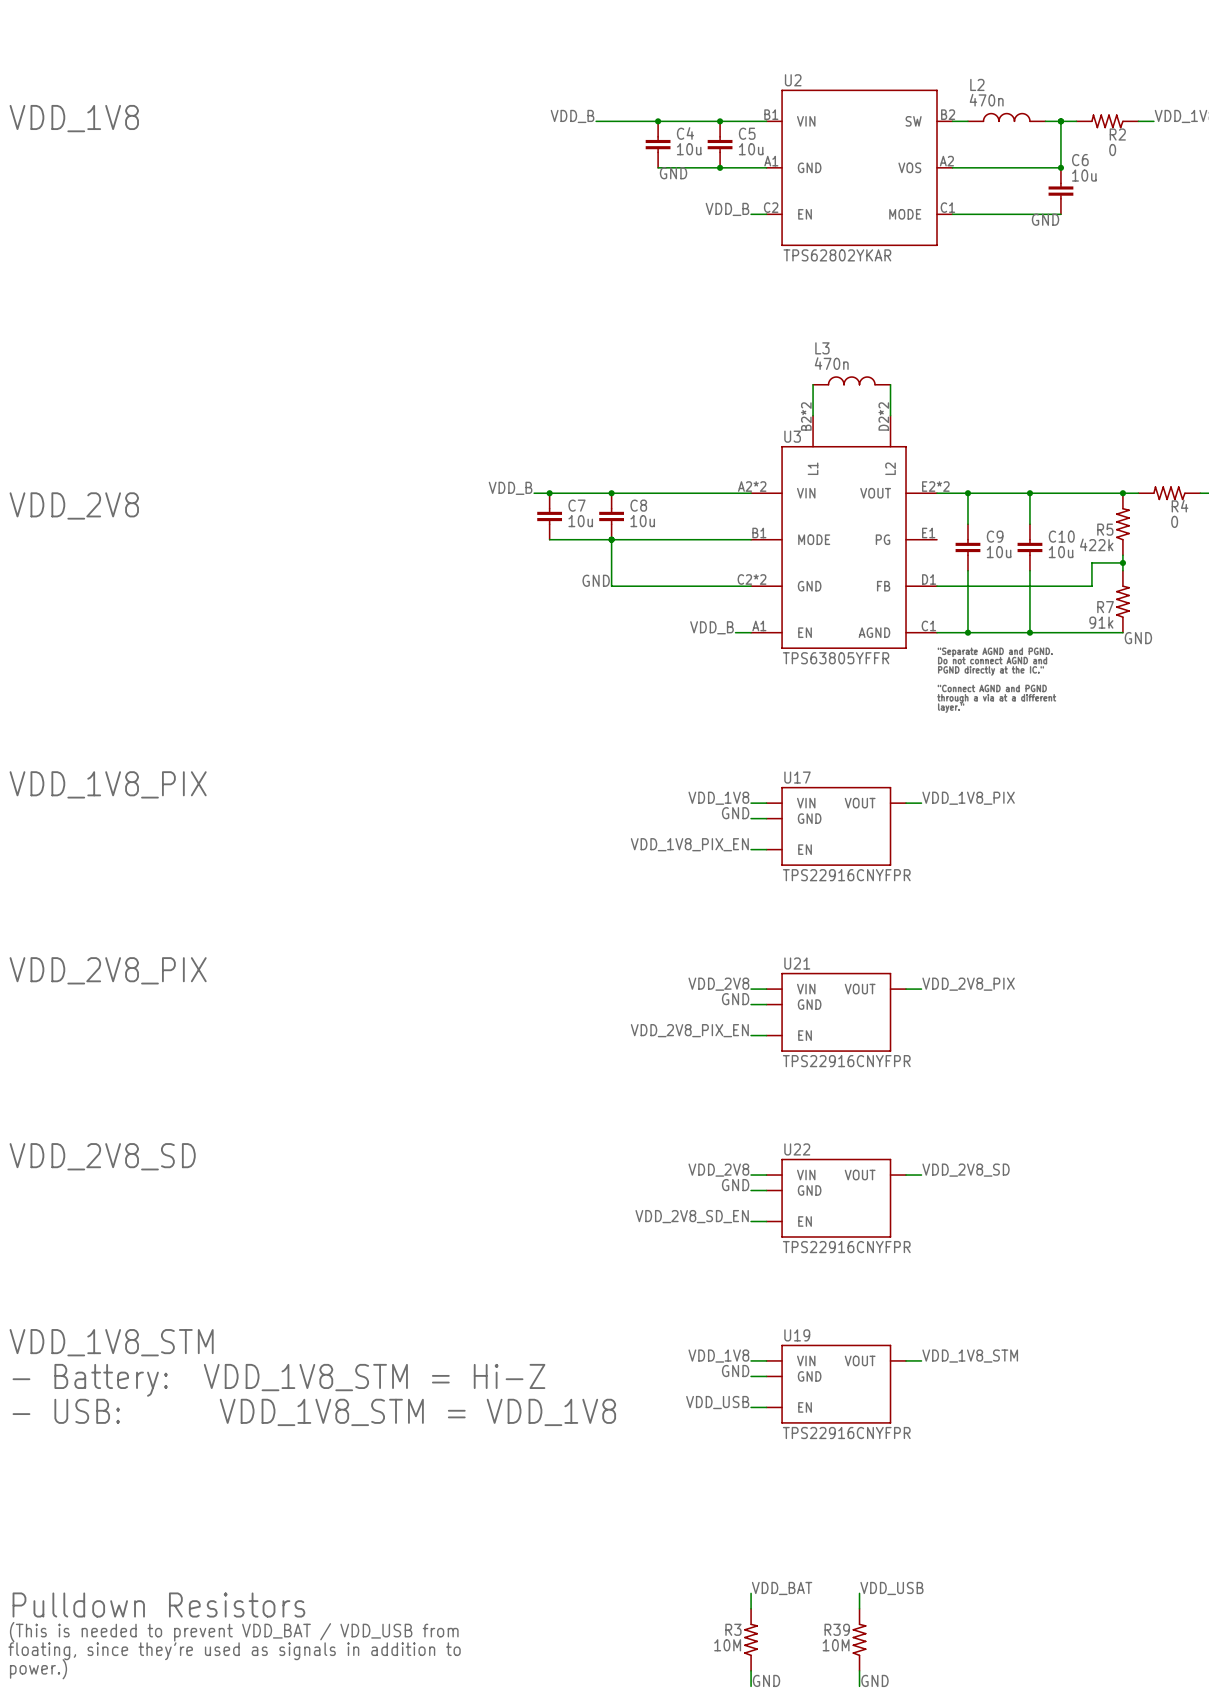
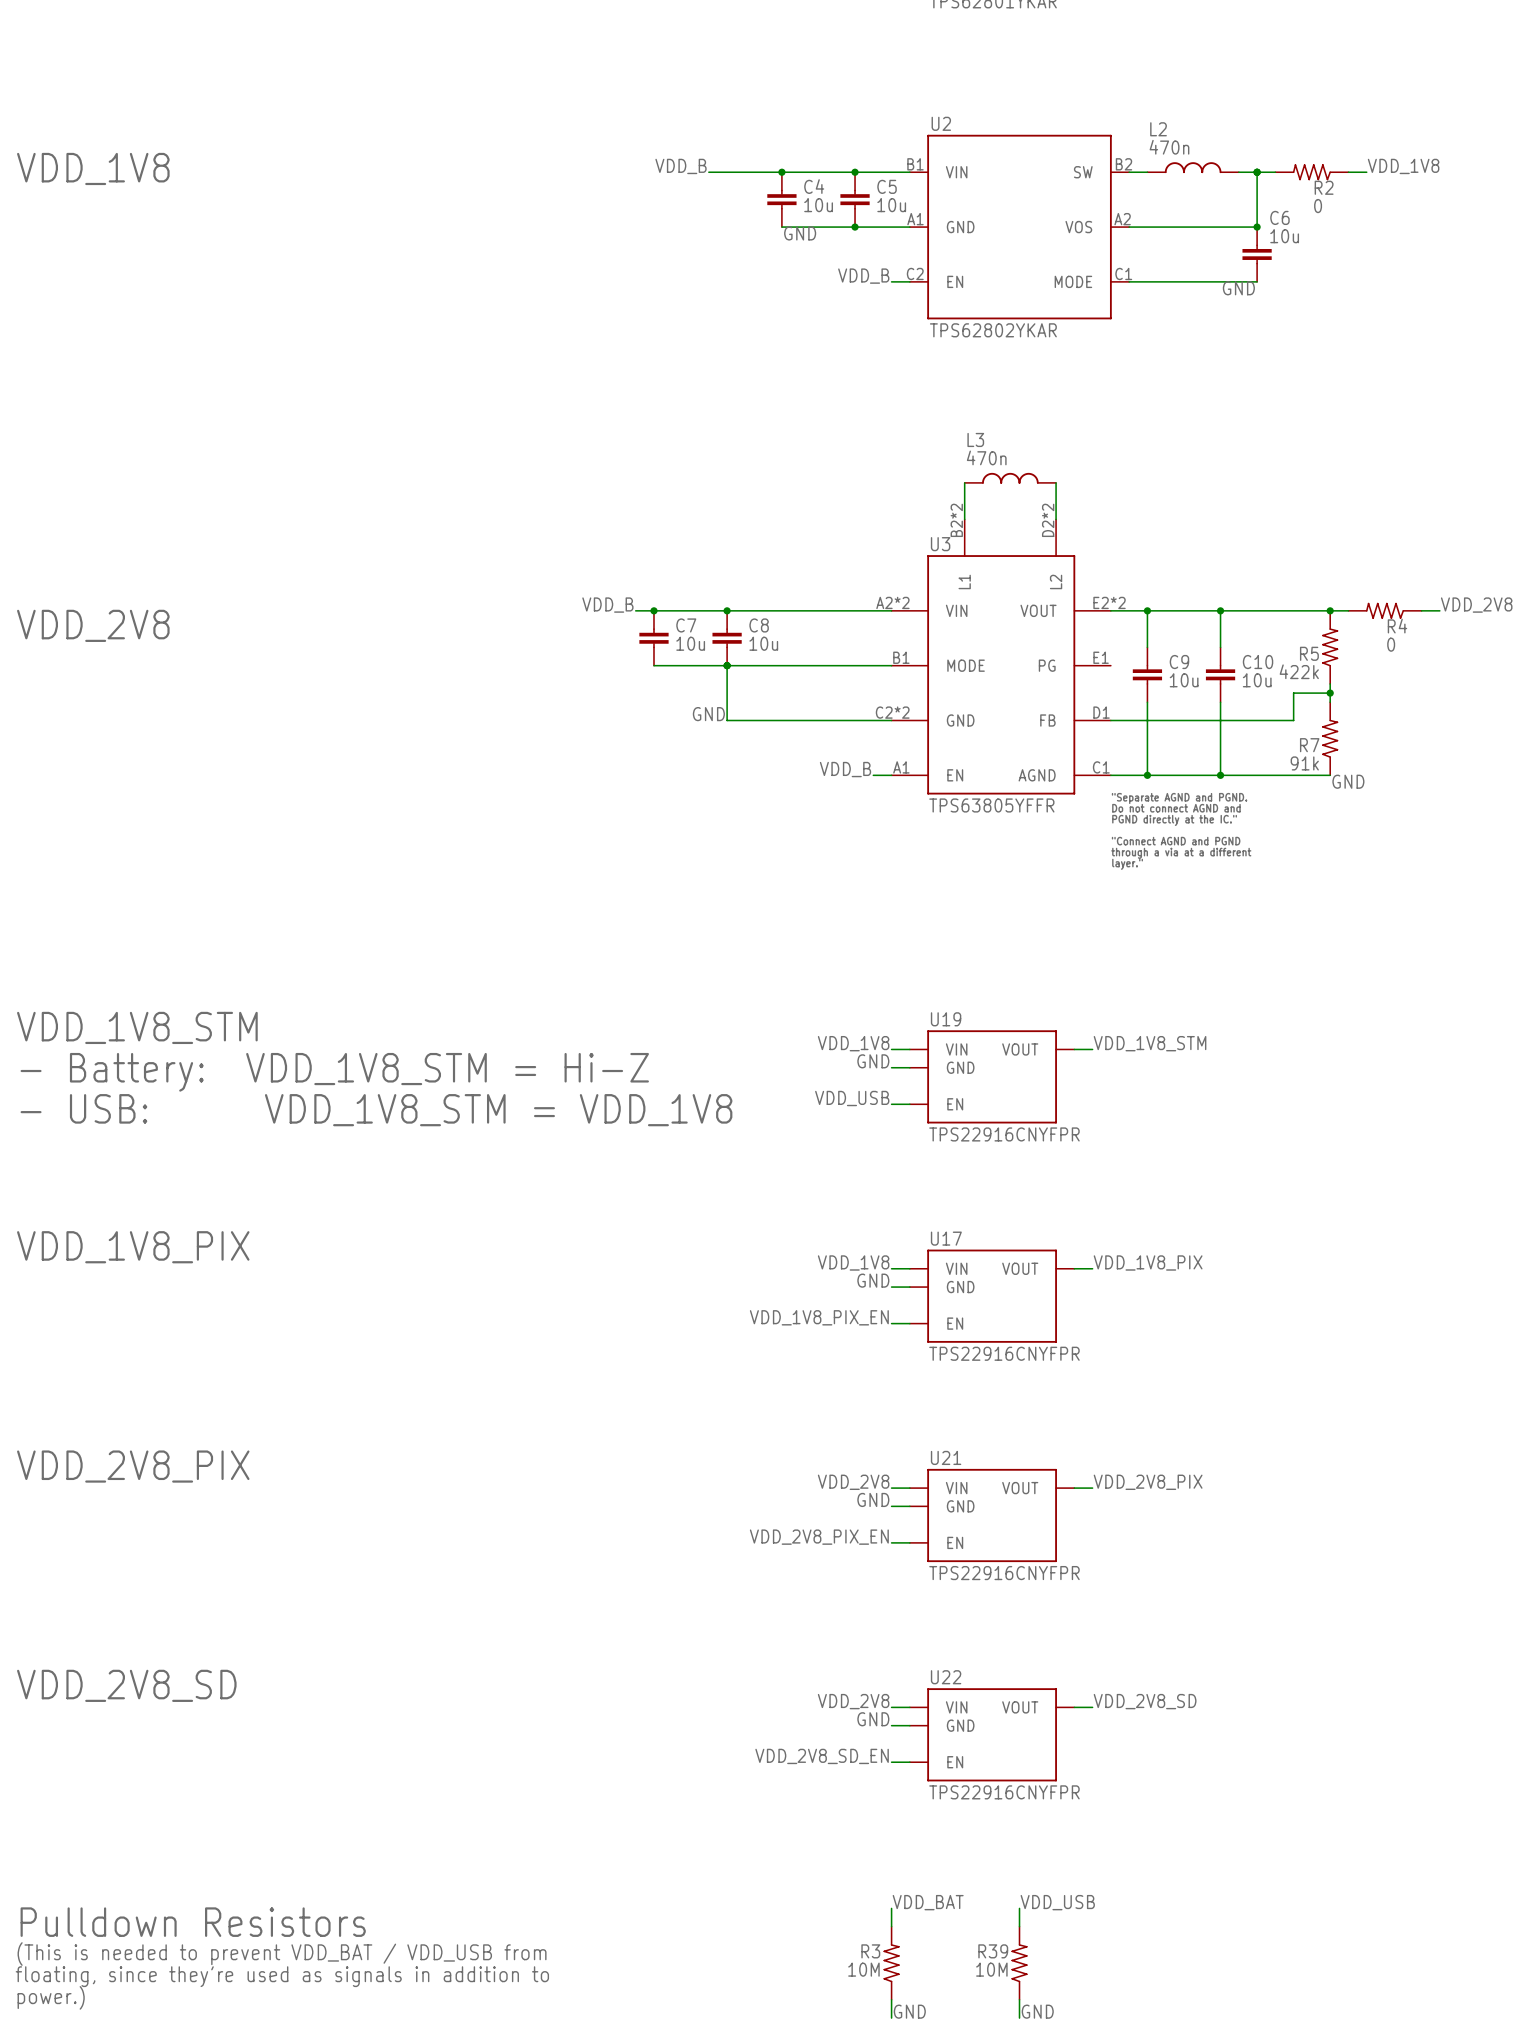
text: VDD_1V8_PIX (108, 784) -> none
label position: VDD_1V8 (718, 798) -> VDD_1V8 (853, 1043)
label: VDD_1V8_PIX (968, 798) -> none
wire: (751, 803) (766, 803) -> (891, 1049) (909, 1049)
wire: (906, 803) (921, 803) -> (1074, 1049) (1092, 1049)
label: GND (735, 813) -> none
wire: (751, 818) (766, 818) -> (891, 1067) (909, 1067)
U17 position: (836, 826) -> (992, 1296)
label: VDD_1V8_PIX_EN (689, 844) -> none
text: none -> VDD_1V8_STM (137, 1027)
wire: (751, 849) (766, 849) -> (891, 1104) (909, 1104)
label: none -> VDD_1V8_STM (1150, 1043)
label: none -> GND (873, 1061)
text: none -> - Battery: VDD_1V8_STM = Hi-Z (334, 1072)
label: none -> VDD_USB (852, 1098)
text: none -> - USB: VDD_1V8_STM = VDD_1V8 (376, 1110)
text: VDD_2V8_PIX (108, 970) -> none
label: VDD_2V8 (718, 984) -> none
label: VDD_2V8_PIX (968, 984) -> none
wire: (751, 989) (766, 989) -> (891, 1268) (909, 1268)
wire: (906, 989) (921, 989) -> (1074, 1268) (1092, 1268)
label: GND (735, 999) -> none
wire: (751, 1004) (766, 1004) -> (891, 1287) (909, 1287)
U21 position: (836, 1012) -> (992, 1515)
label: VDD_2V8_PIX_EN (689, 1030) -> none
text: none -> VDD_1V8_PIX (133, 1247)
wire: (751, 1035) (766, 1035) -> (891, 1323) (909, 1323)
label: none -> VDD_1V8 (853, 1262)
label: none -> VDD_1V8_PIX (1148, 1262)
label: none -> GND (873, 1280)
label: none -> VDD_1V8_PIX_EN (819, 1317)
text: VDD_2V8_SD (102, 1156) -> none
label position: VDD_2V8 (718, 1170) -> VDD_2V8 (853, 1482)
label: VDD_2V8_SD (966, 1170) -> none
wire: (751, 1175) (766, 1175) -> (891, 1488) (909, 1488)
wire: (906, 1175) (921, 1175) -> (1074, 1488) (1092, 1488)
label: GND (735, 1185) -> none
wire: (751, 1190) (766, 1190) -> (891, 1506) (909, 1506)
U22 position: (836, 1198) -> (992, 1734)
label: VDD_2V8_SD_EN (692, 1216) -> none
text: none -> VDD_2V8_PIX (133, 1466)
wire: (751, 1221) (766, 1221) -> (891, 1542) (909, 1542)
label: none -> VDD_2V8_PIX (1148, 1482)
label: none -> GND (873, 1499)
label: none -> VDD_2V8_PIX_EN (819, 1537)
text: VDD_1V8_STM (111, 1342) -> none
label: VDD_1V8 (718, 1356) -> none
label: VDD_1V8_STM (970, 1356) -> none
wire: (751, 1360) (766, 1360) -> (891, 1707) (909, 1707)
wire: (906, 1360) (921, 1360) -> (1074, 1707) (1092, 1707)
label: GND (735, 1371) -> none
wire: (751, 1376) (766, 1376) -> (891, 1725) (909, 1725)
text: - Battery: VDD_1V8_STM = Hi-Z (278, 1380) -> none
U19 position: (836, 1384) -> (992, 1076)
label: VDD_USB (717, 1402) -> none
text: none -> VDD_2V8_SD (126, 1685)
wire: (751, 1407) (766, 1407) -> (891, 1762) (909, 1762)
text: - USB: VDD_1V8_STM = VDD_1V8 (314, 1412) -> none
label: none -> VDD_2V8 (853, 1701)
label: none -> VDD_2V8_SD (1145, 1701)
label: none -> GND (873, 1719)
label: none -> VDD_2V8_SD_EN (822, 1756)

